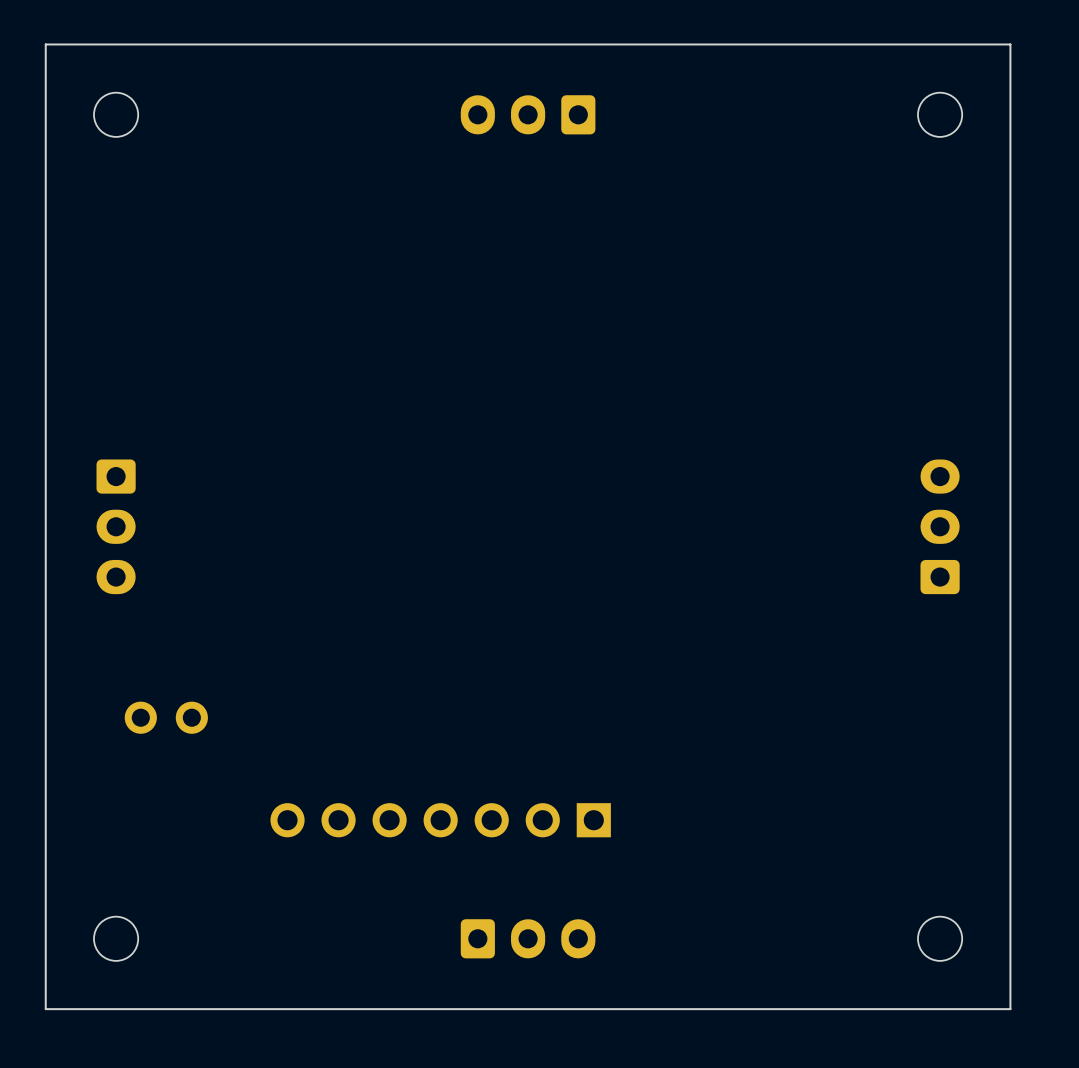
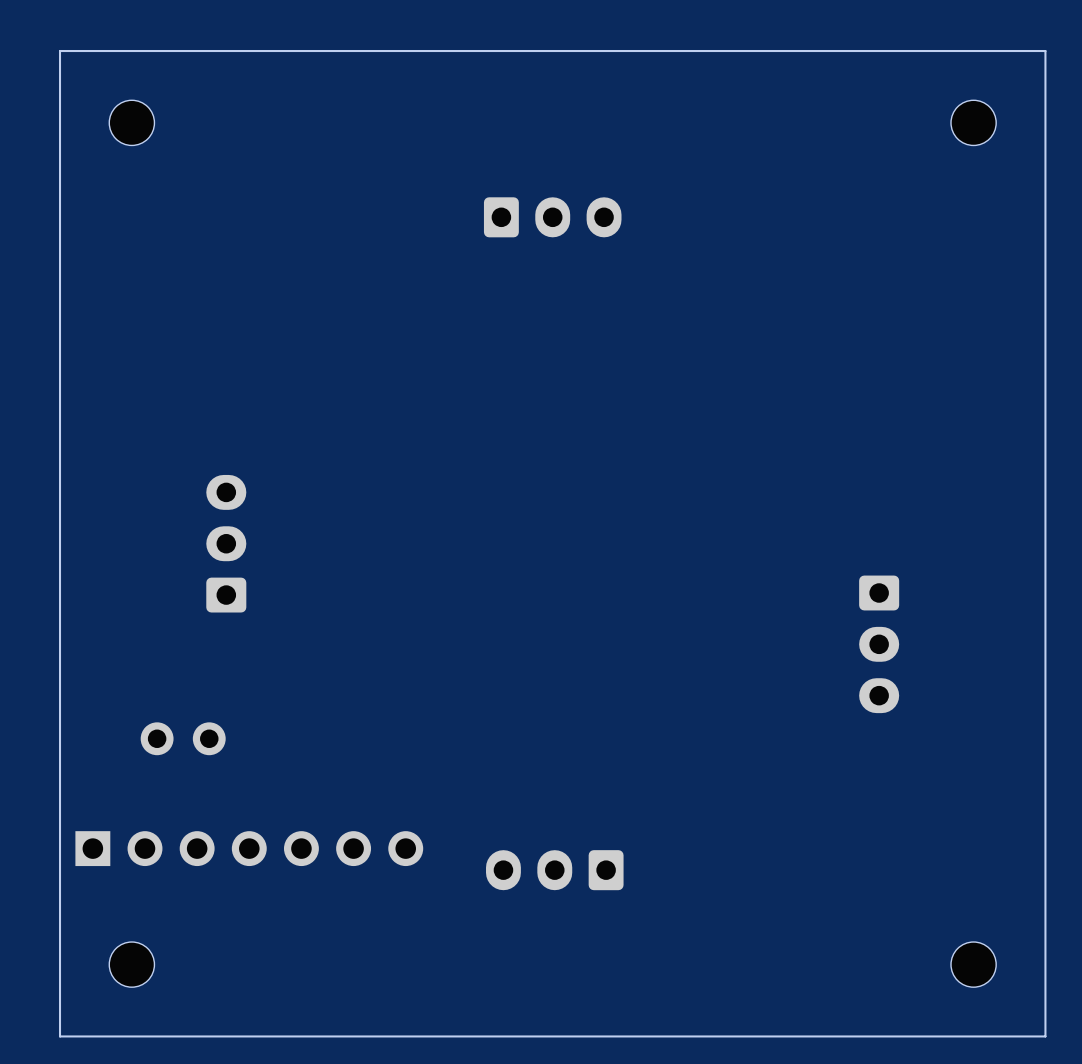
part rotation: 0° (528, 114) -> 180° (552, 217)
part position: (528, 114) -> (552, 217)
part rotation: 0° (116, 526) -> 180° (226, 543)
part position: (116, 526) -> (226, 543)
part rotation: 0° (940, 526) -> 180° (879, 644)
part position: (940, 526) -> (879, 644)
part rotation: 0° (440, 820) -> 180° (249, 848)
part position: (440, 820) -> (249, 848)
part rotation: 0° (528, 938) -> 180° (554, 870)
part position: (528, 938) -> (554, 870)

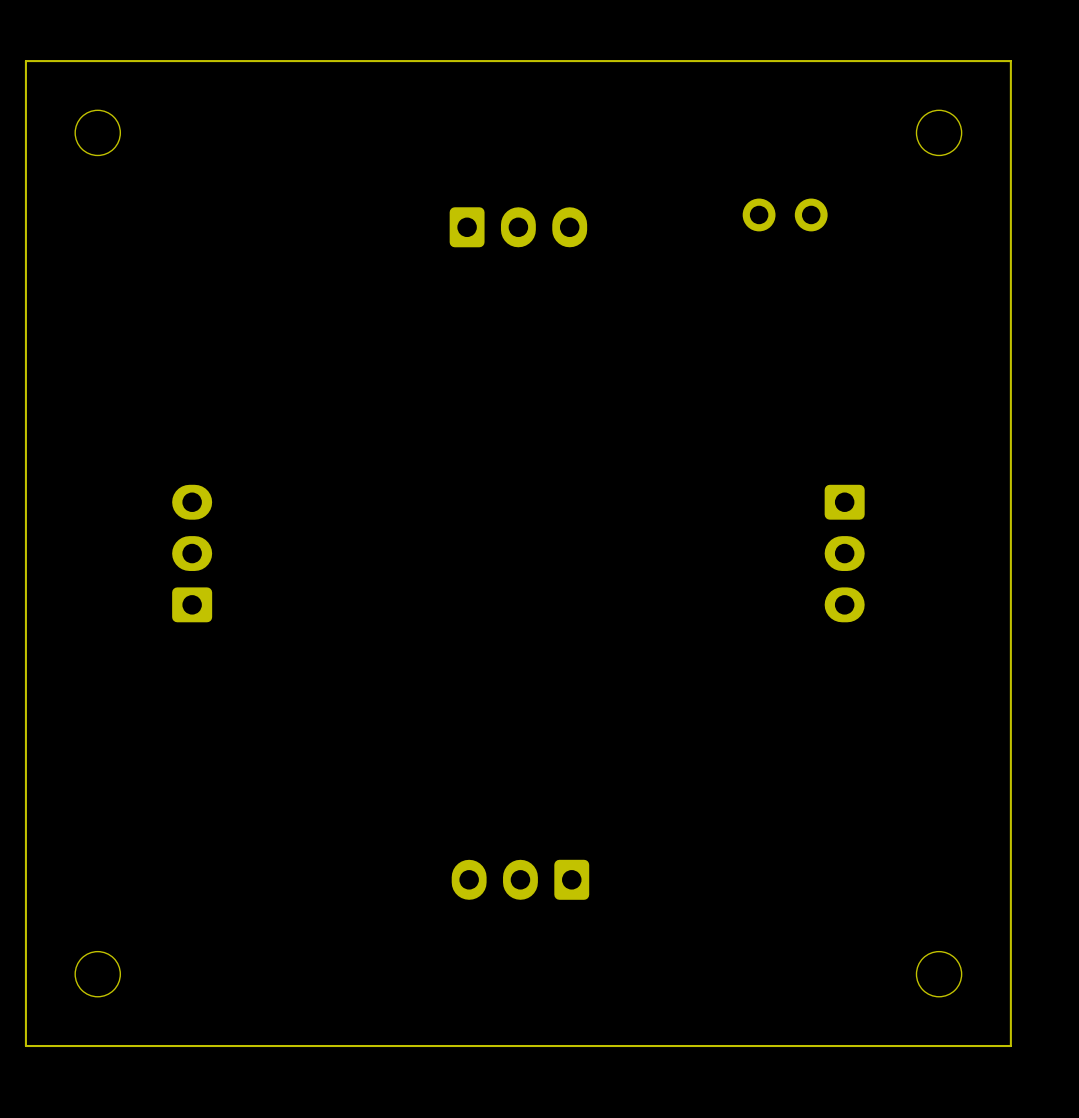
part: none -> (785, 214)
part position: (879, 644) -> (844, 553)
part: (183, 738) -> none
part: (249, 848) -> none

